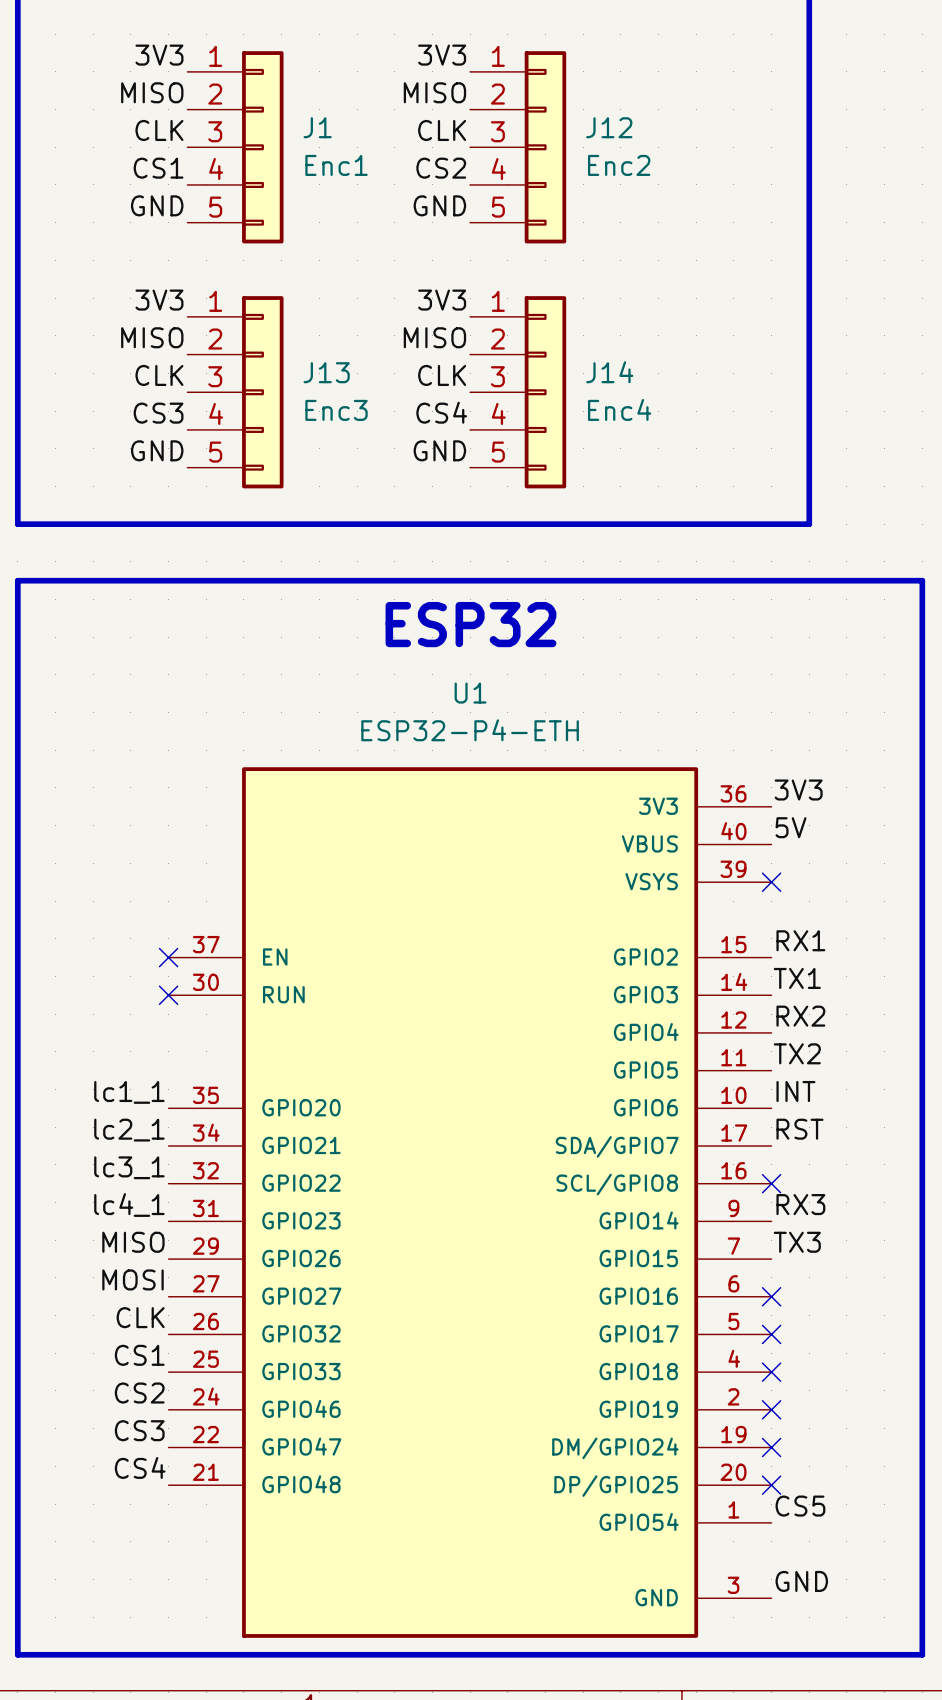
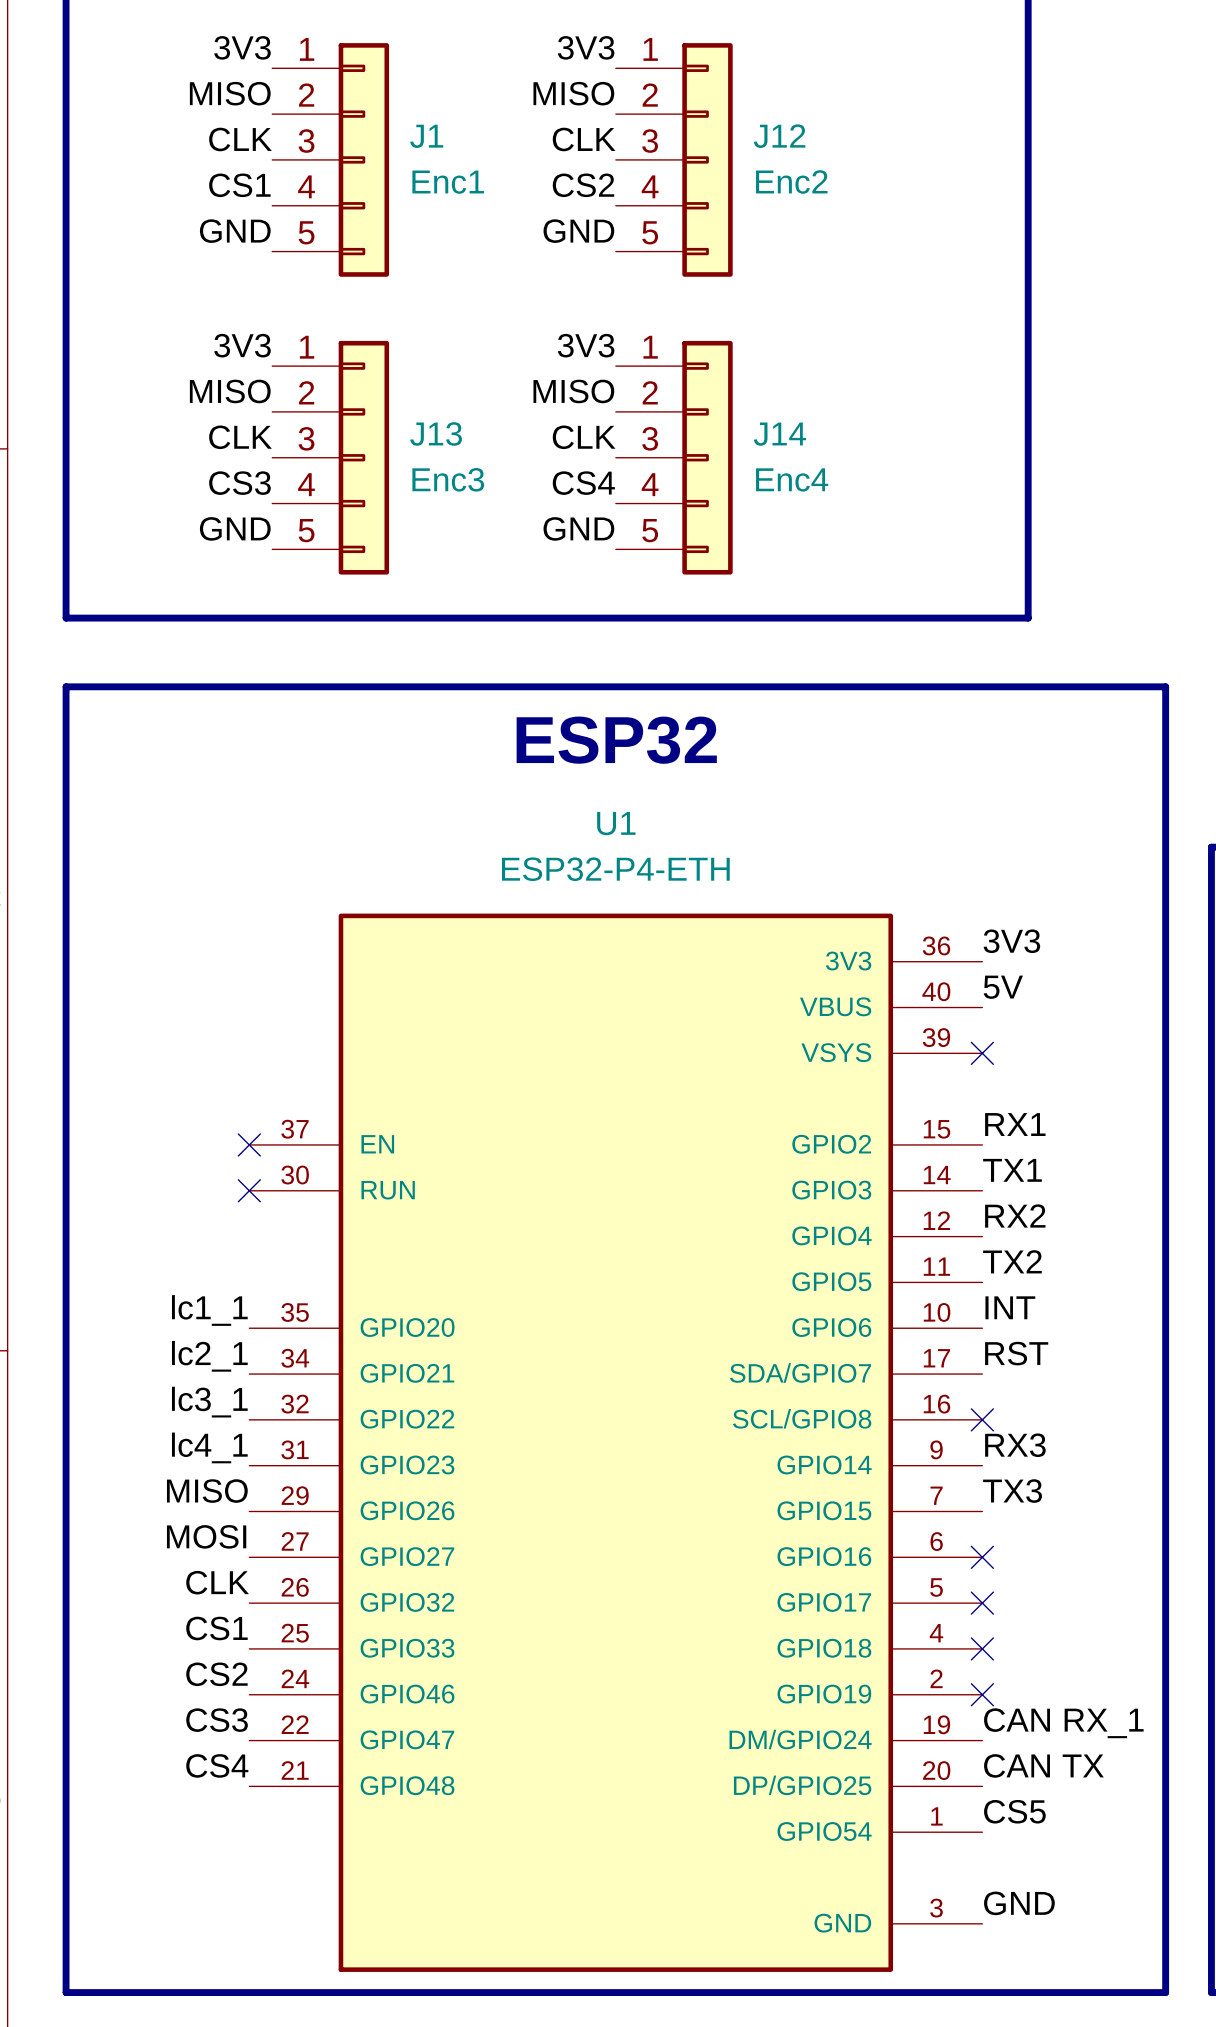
label: none -> CAN RX_1 (1063, 1723)
no-connect mark: (771, 1447) -> none
label: none -> CAN TX (1043, 1765)
no-connect mark: (771, 1485) -> none

